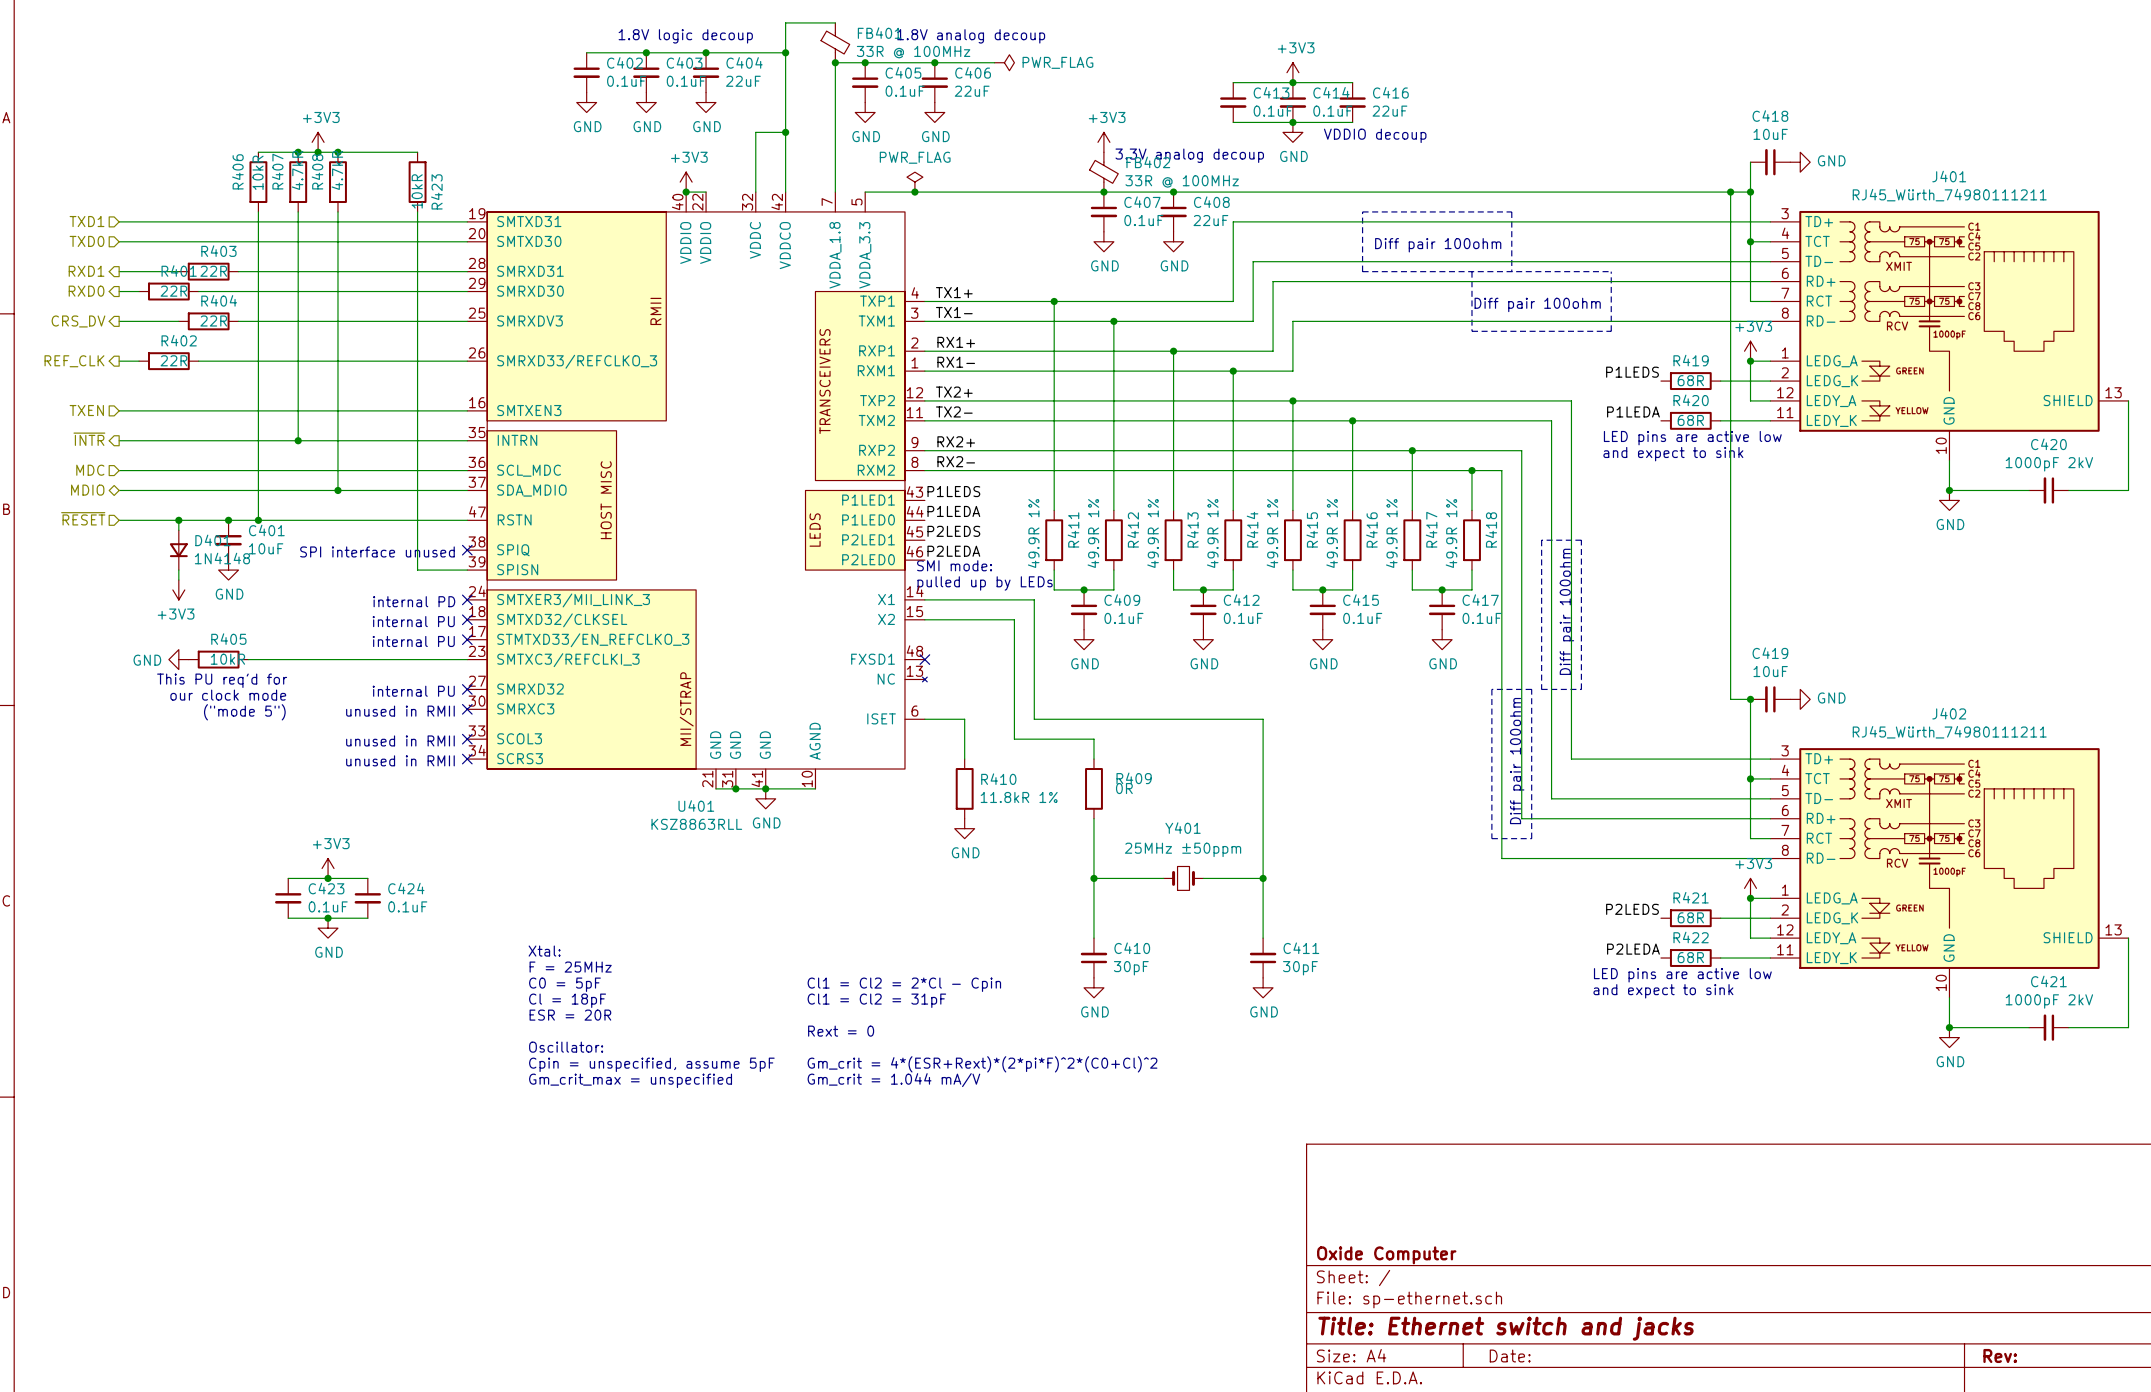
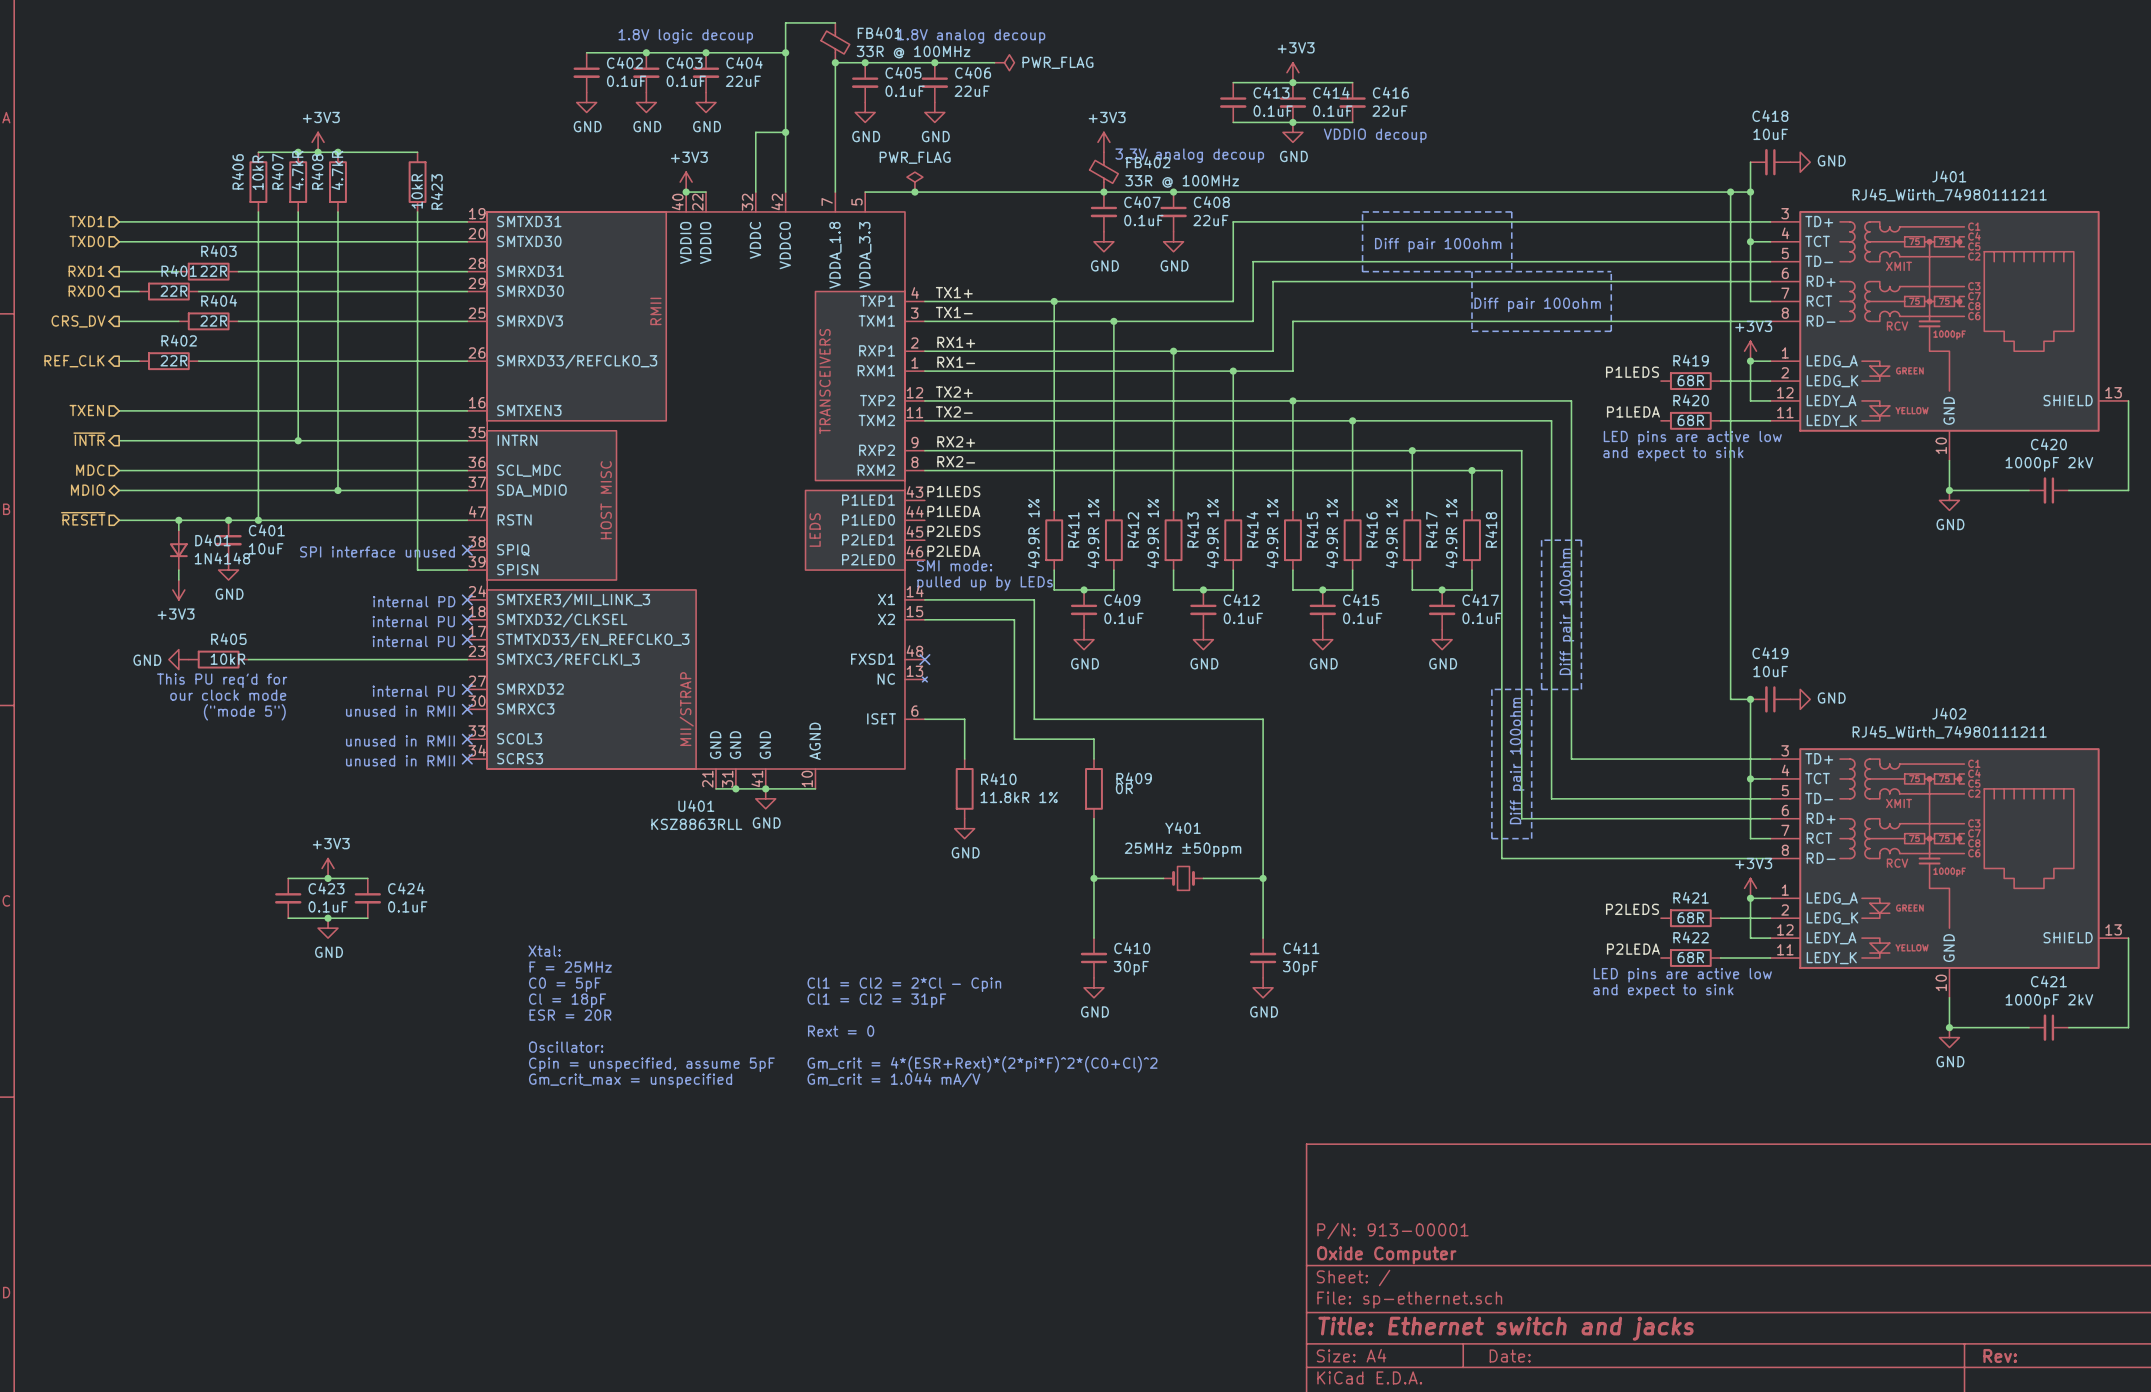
title block: none -> P/N: 913-00001 (1392, 1231)

